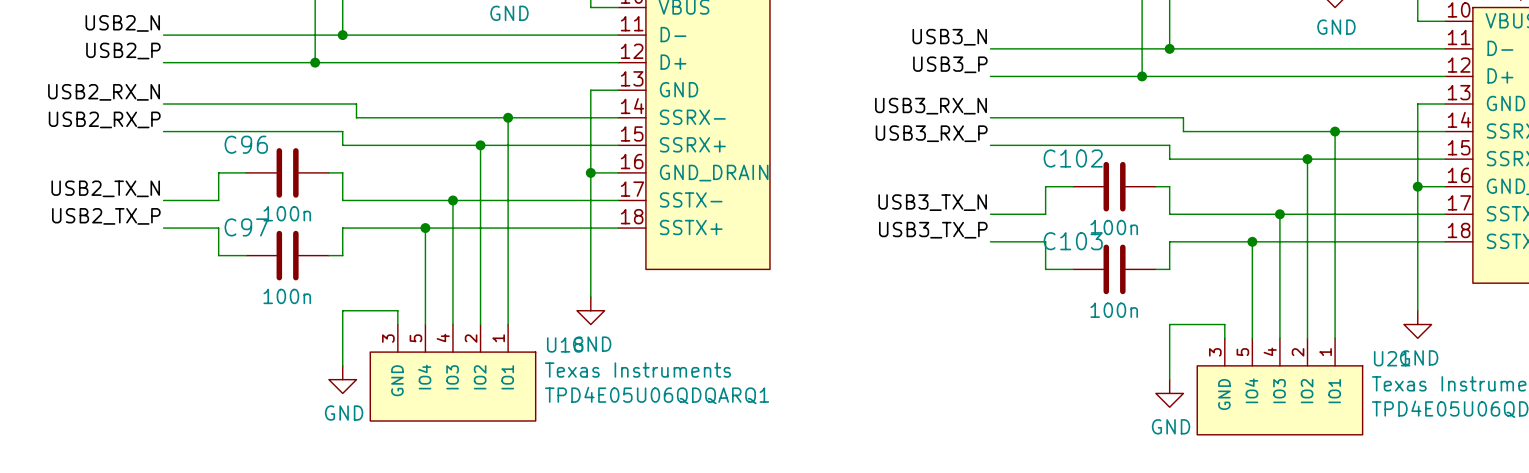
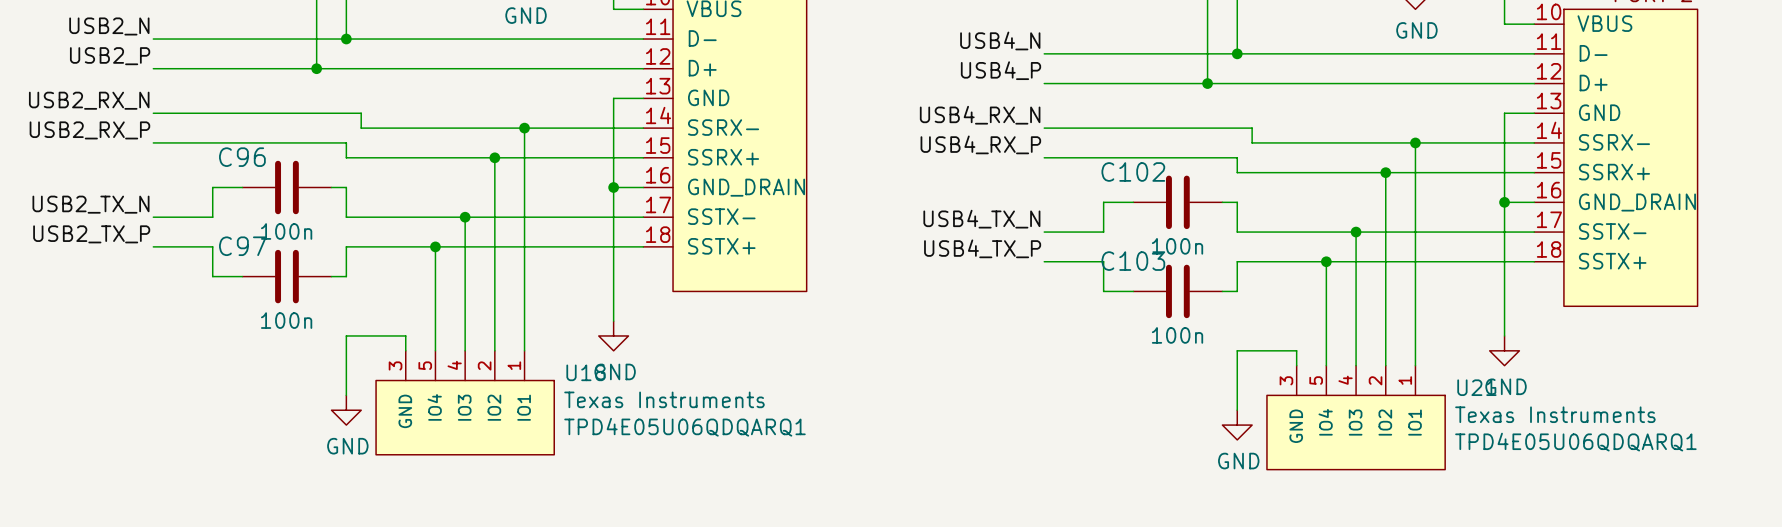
label: USB3_N (949, 37) -> USB4_N (1000, 40)
label: USB3_P (950, 64) -> USB4_P (1000, 70)
label: USB3_RX_N (931, 106) -> USB4_RX_N (980, 115)
label: USB3_RX_P (931, 133) -> USB4_RX_P (980, 144)
label: USB3_TX_N (932, 202) -> USB4_TX_N (981, 219)
label: USB3_TX_P (933, 230) -> USB4_TX_P (982, 248)

